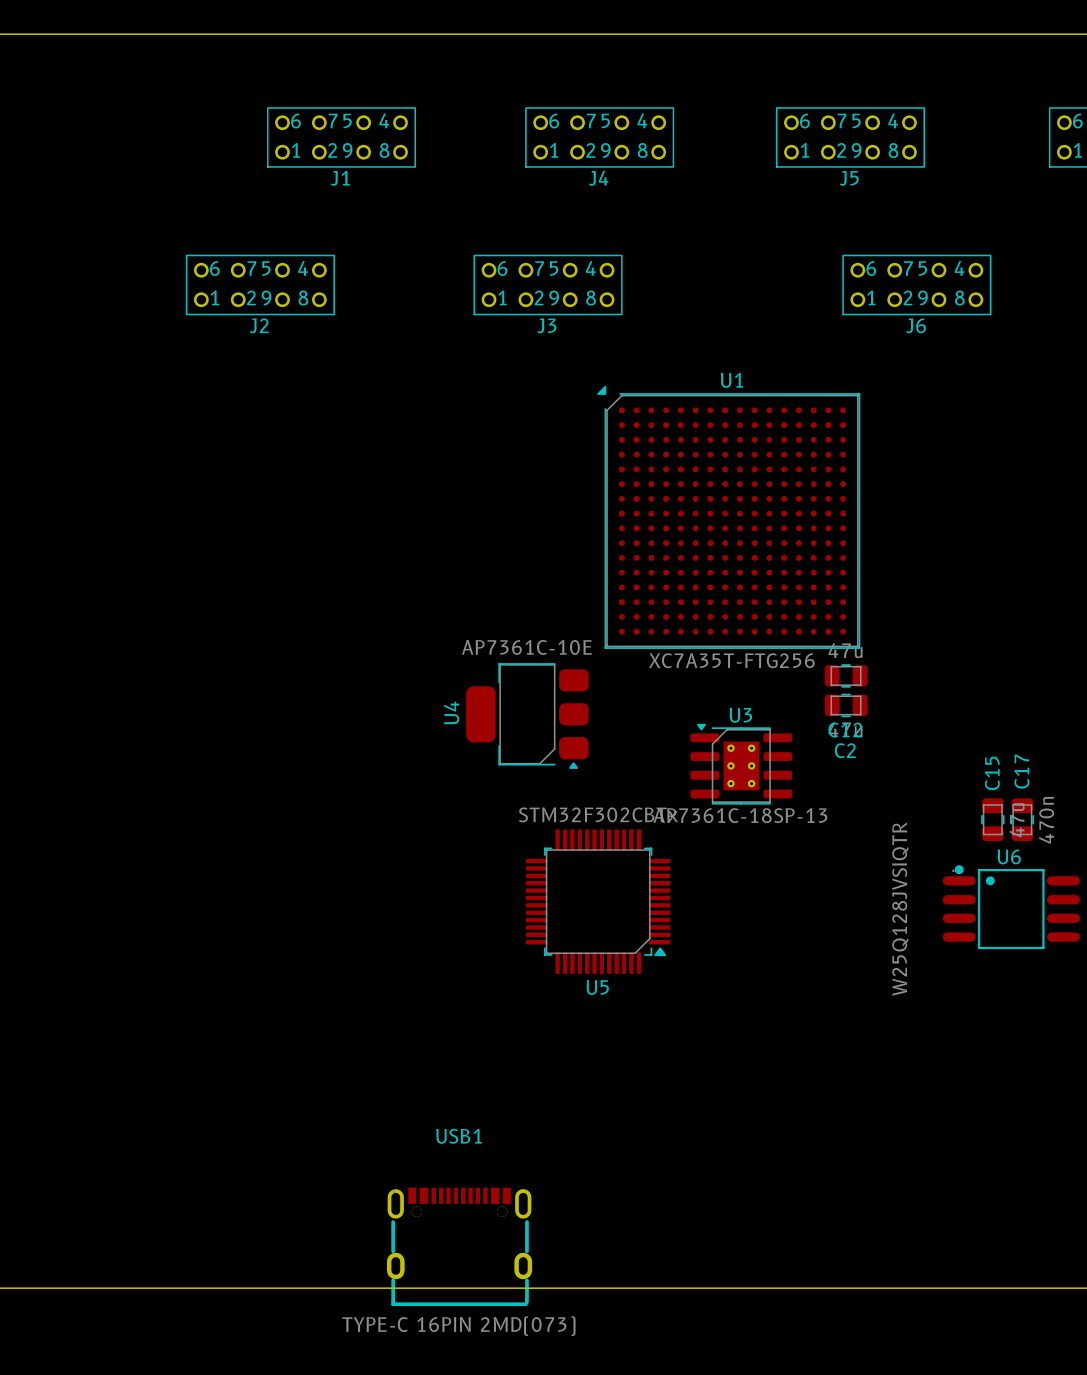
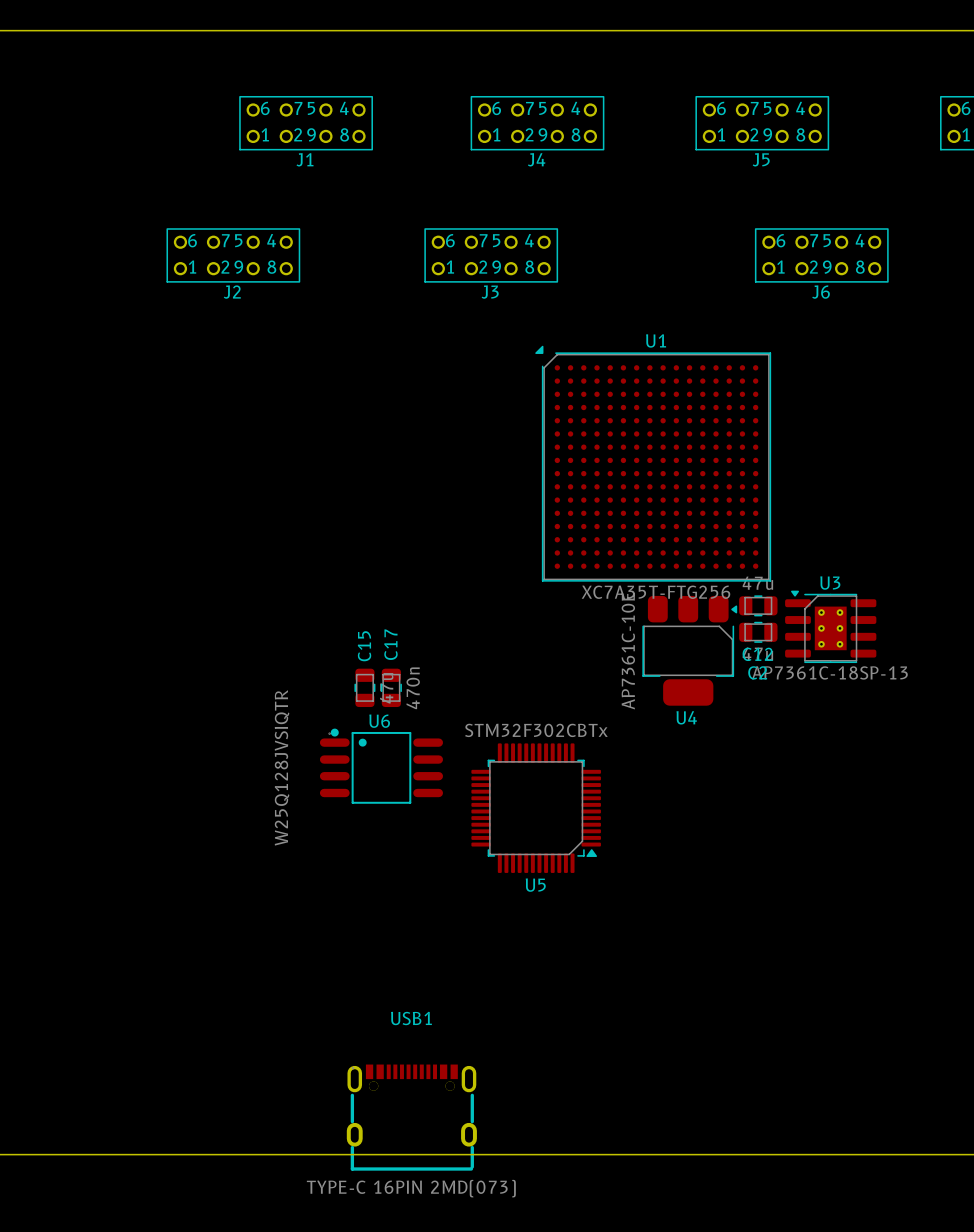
U4 rotation: 0° (527, 715) -> 90° counterclockwise (689, 650)
U4 position: (527, 715) -> (689, 650)
U3 position: (741, 764) -> (830, 626)
C15 position: (992, 819) -> (364, 687)
C17 position: (1022, 819) -> (391, 687)
U6 position: (1011, 907) -> (381, 766)

